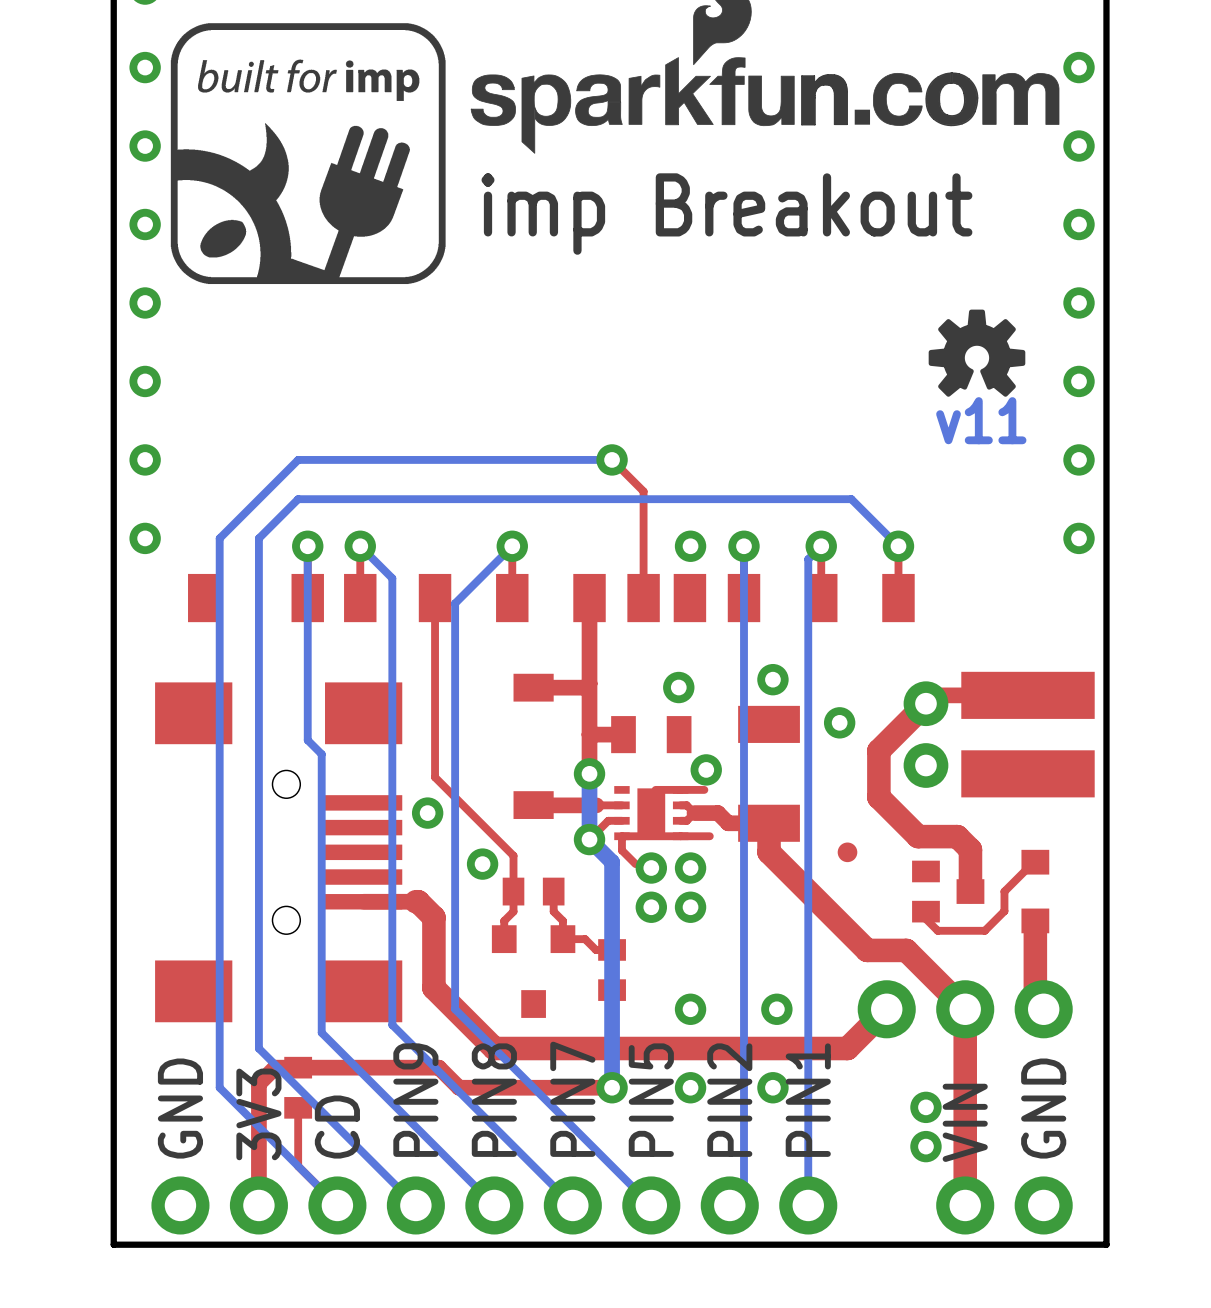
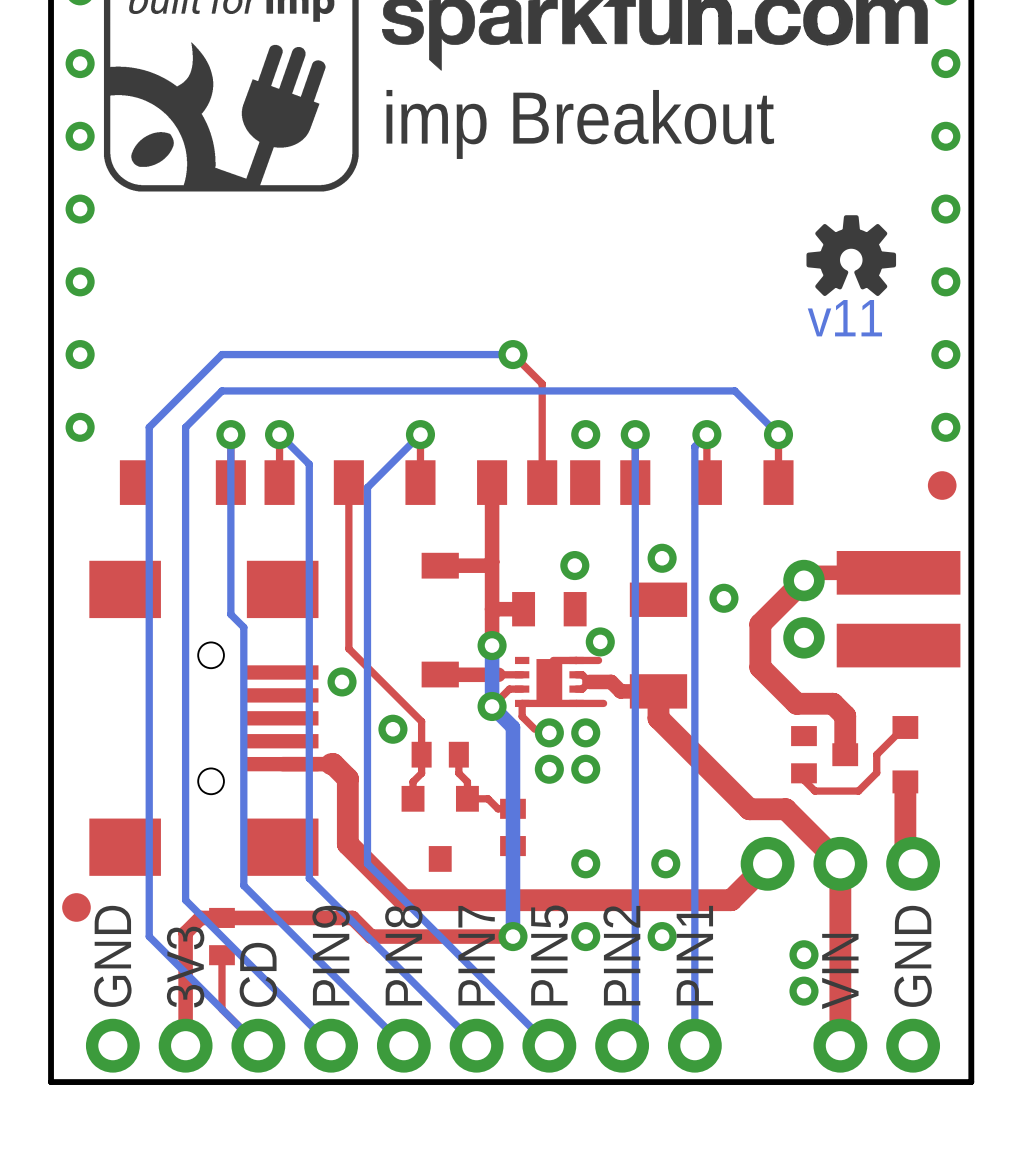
part: none -> (942, 485)
part: (847, 852) -> none
part: none -> (76, 907)

